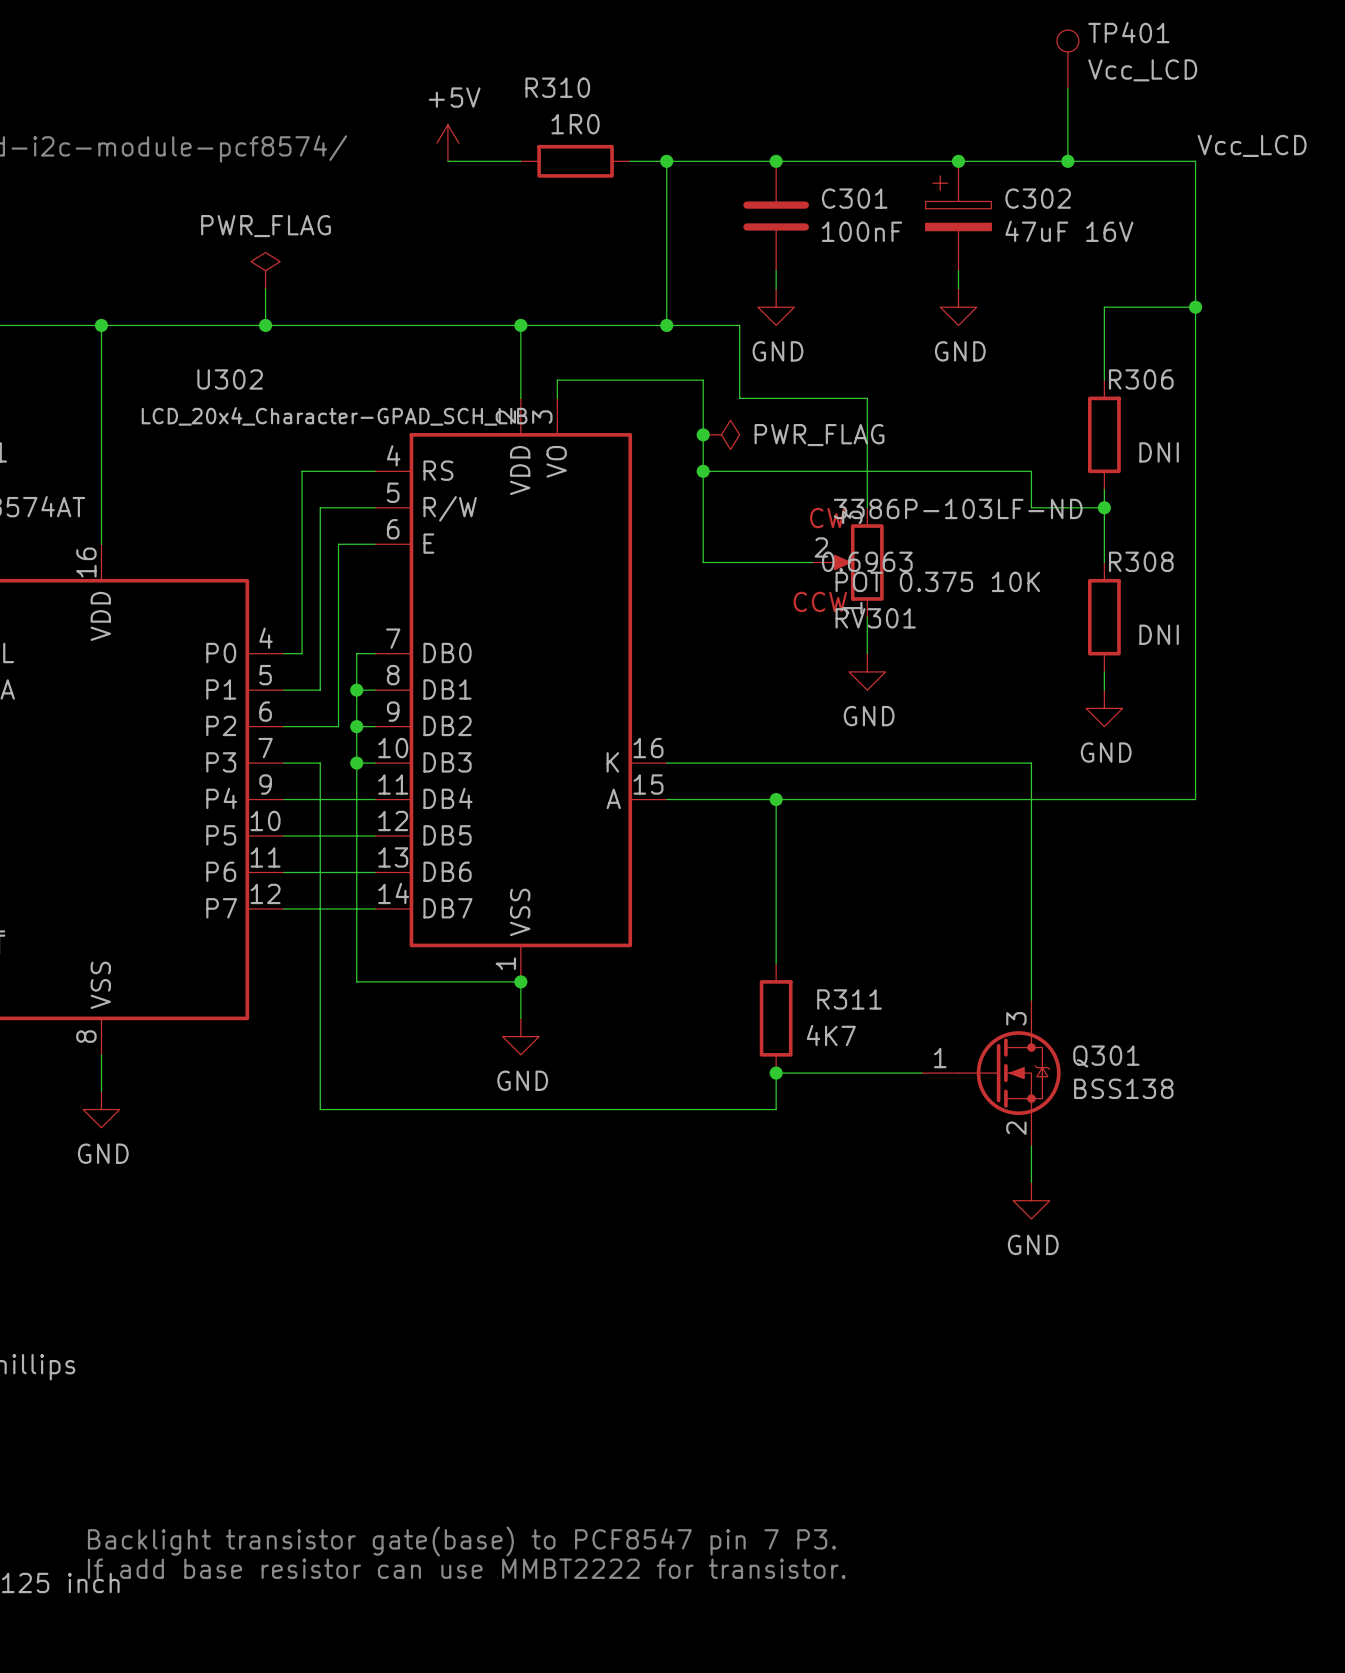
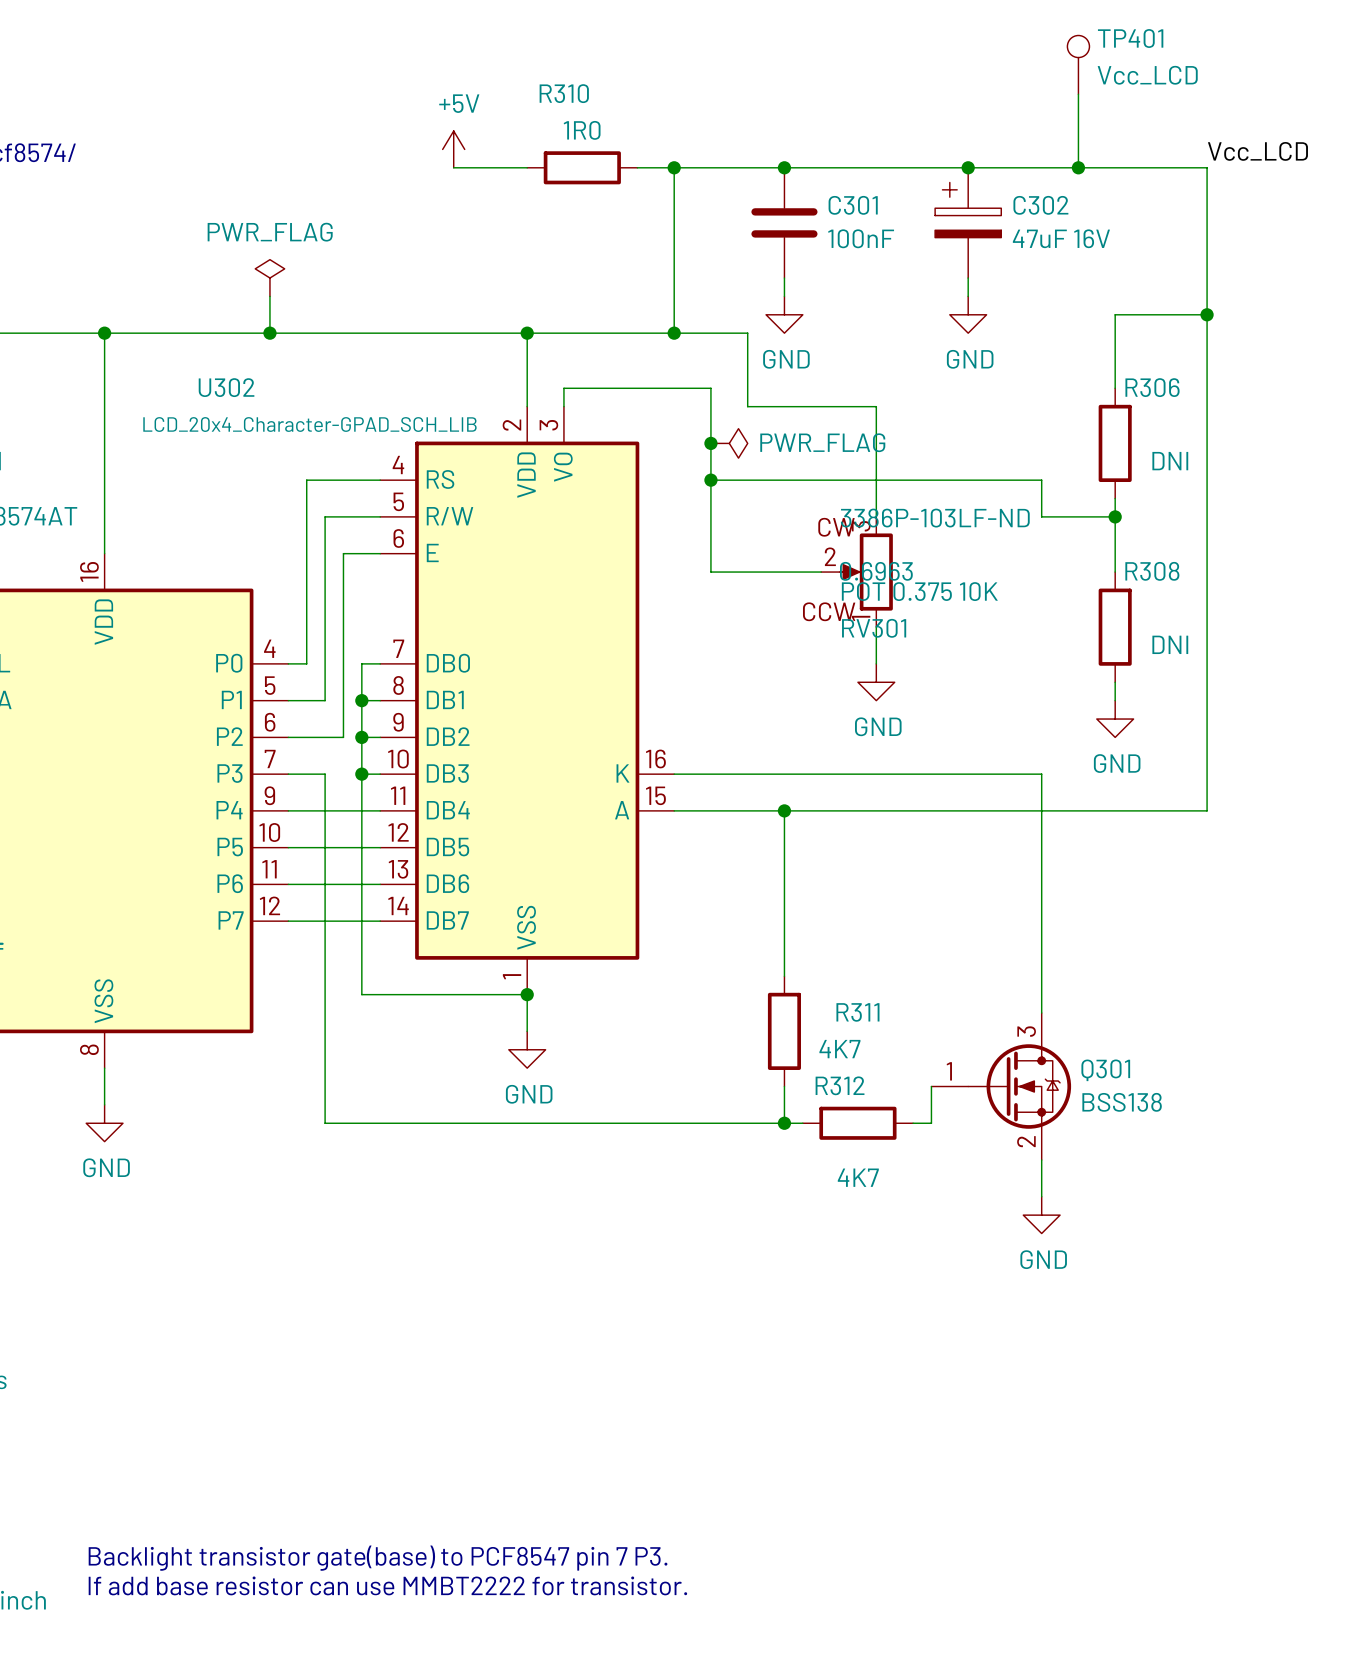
wire: (776, 1073) (922, 1073) -> (913, 1123) (931, 1123) (931, 1086)
junction position: (776, 1073) -> (784, 1123)
wire: none -> (784, 1123) (802, 1123)
R312: none -> 4K7 (857, 1123)

